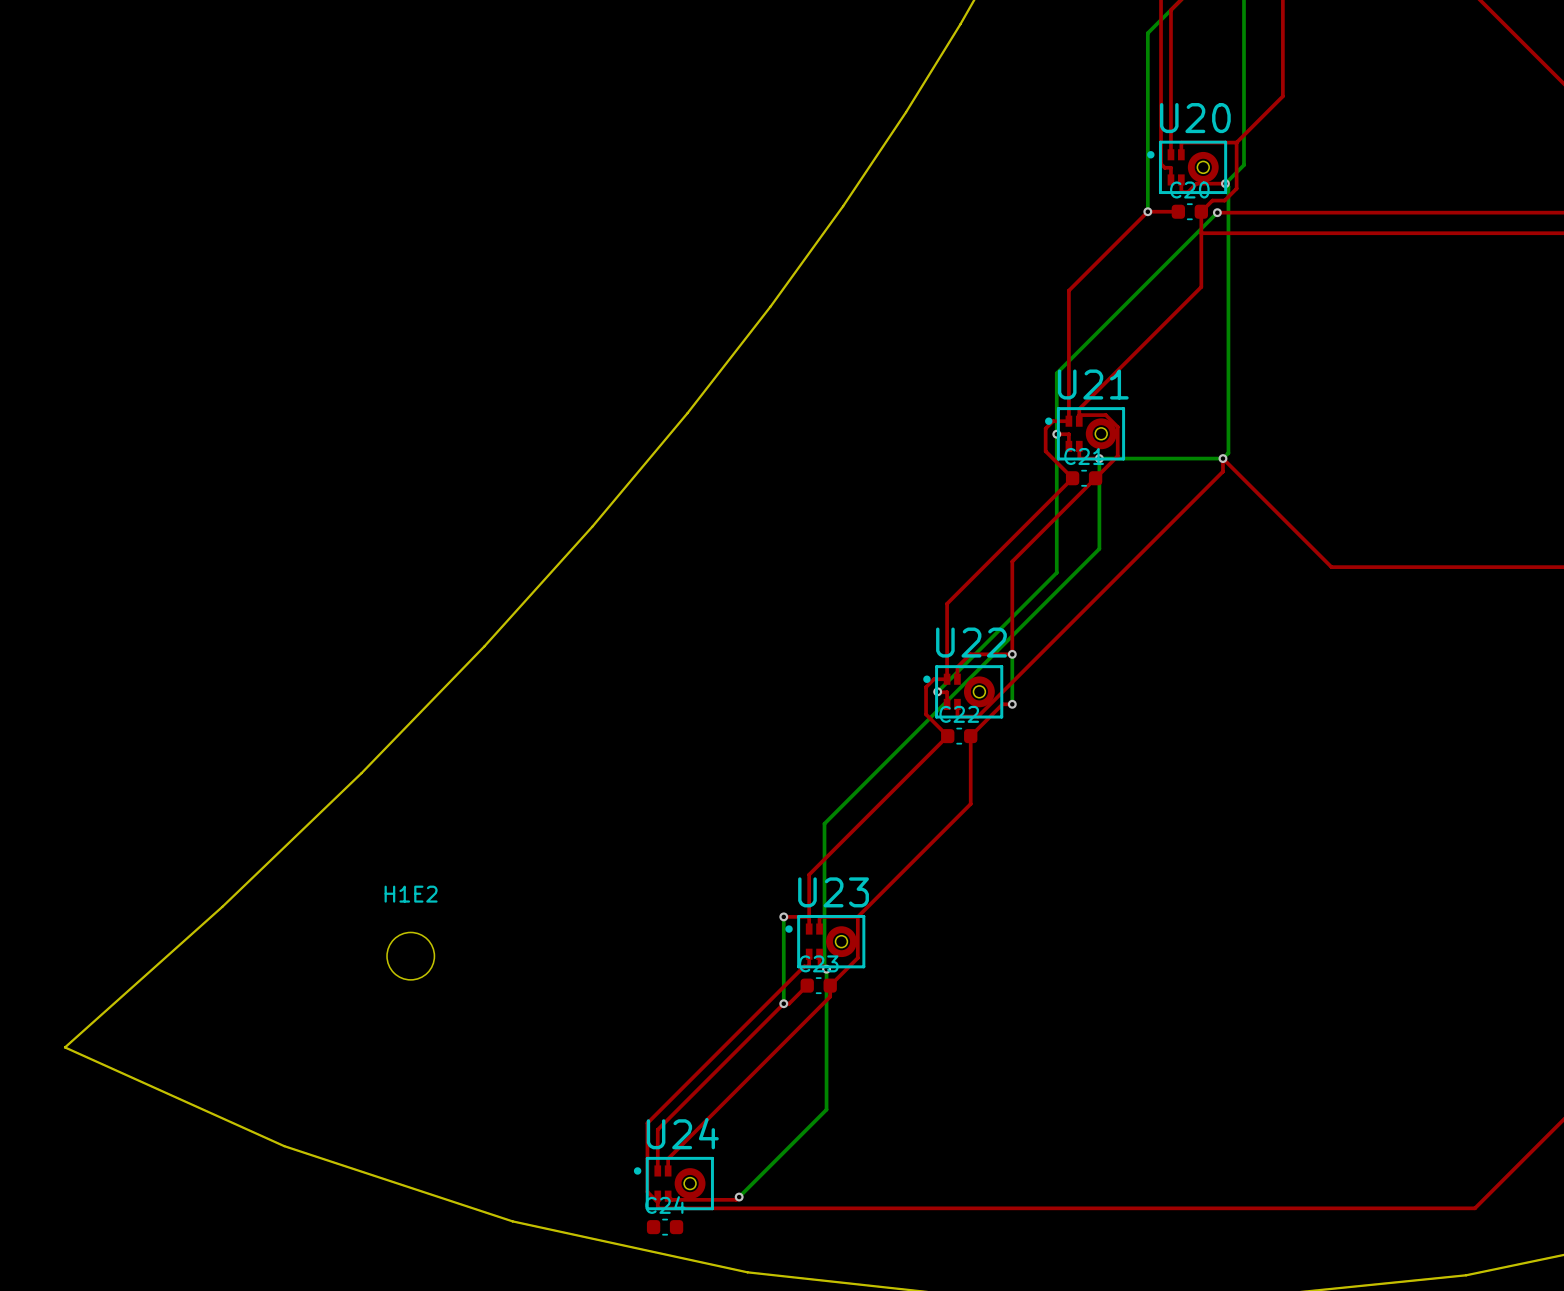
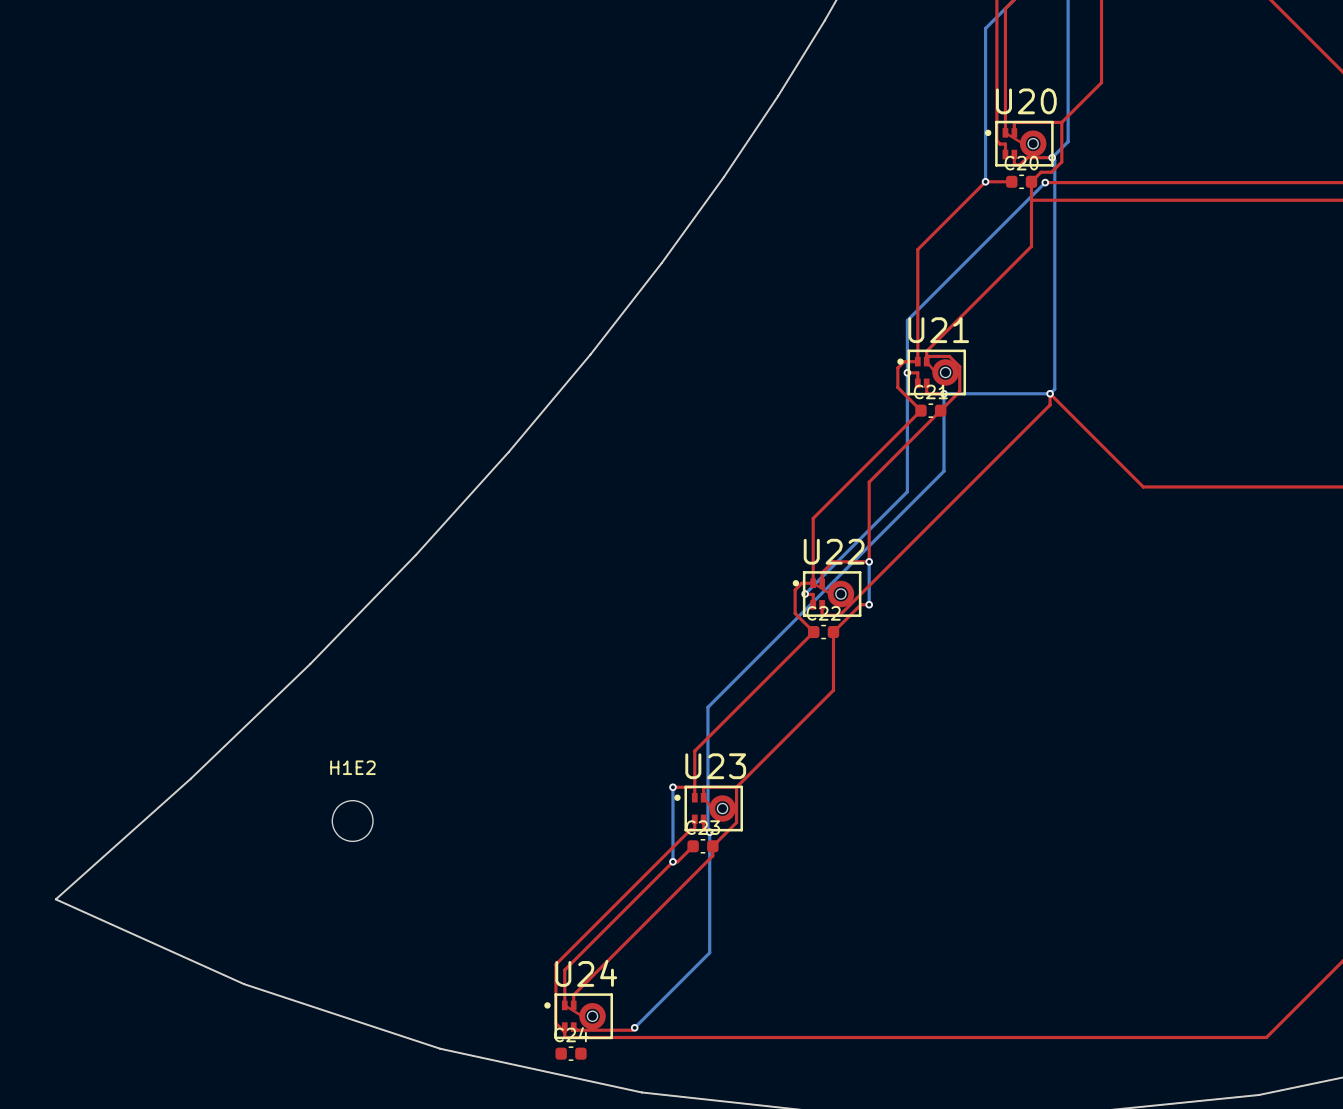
top track: none -> (1005, 132) (1022, 143)
top track: none -> (926, 361) (935, 372)
top track: none -> (813, 583) (830, 594)
top track: none -> (703, 797) (712, 808)
top track: none -> (564, 1005) (582, 1016)

